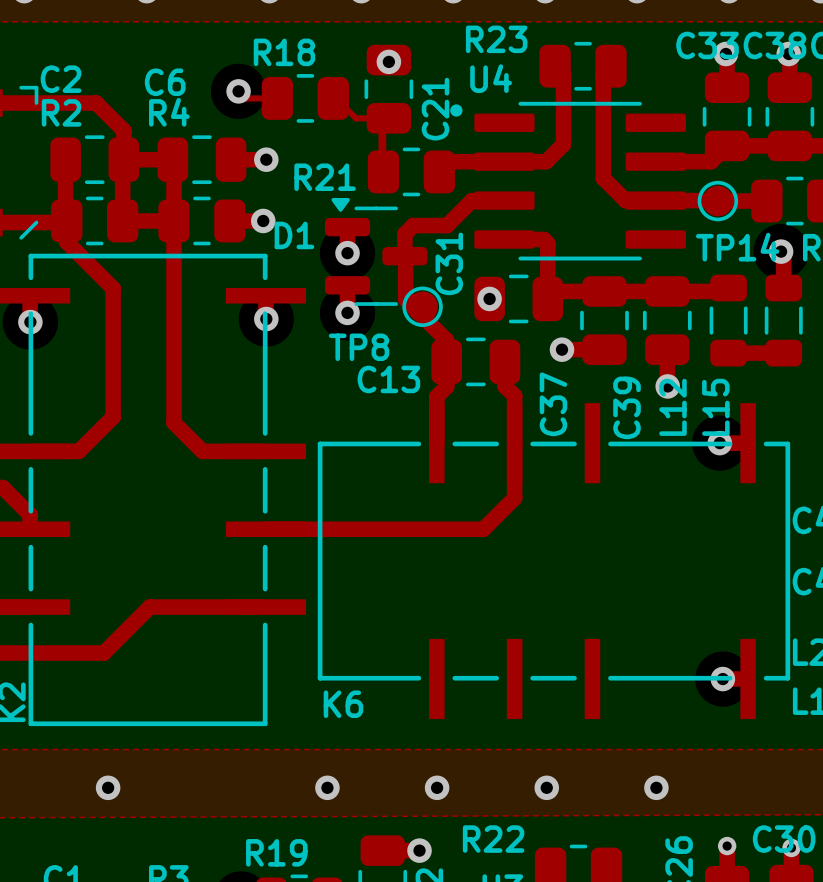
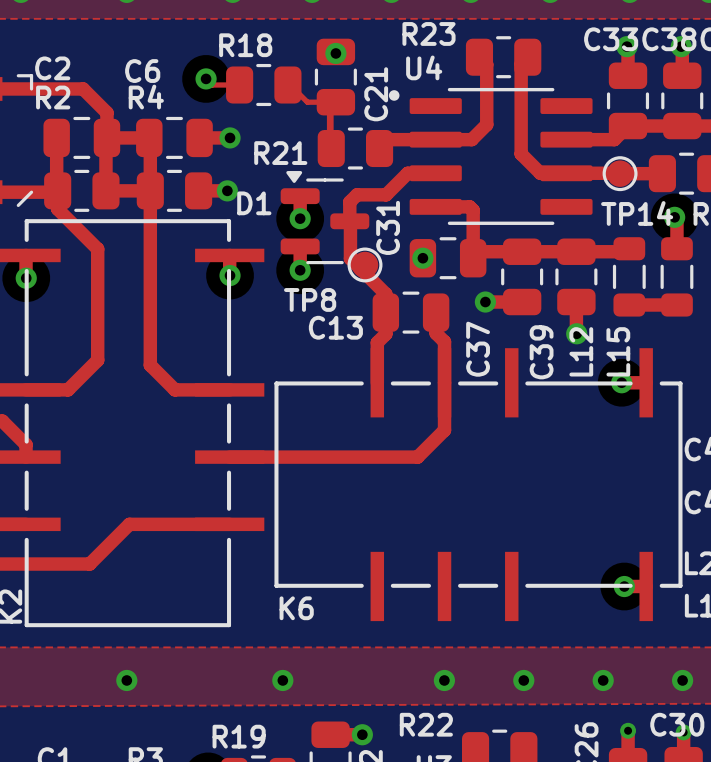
via position: (108, 787) -> (126, 680)
via: (437, 787) -> none
via: none -> (444, 680)
via: (546, 787) -> none
via: none -> (523, 680)
via: (656, 787) -> none
via: none -> (603, 680)
via: none -> (682, 680)

